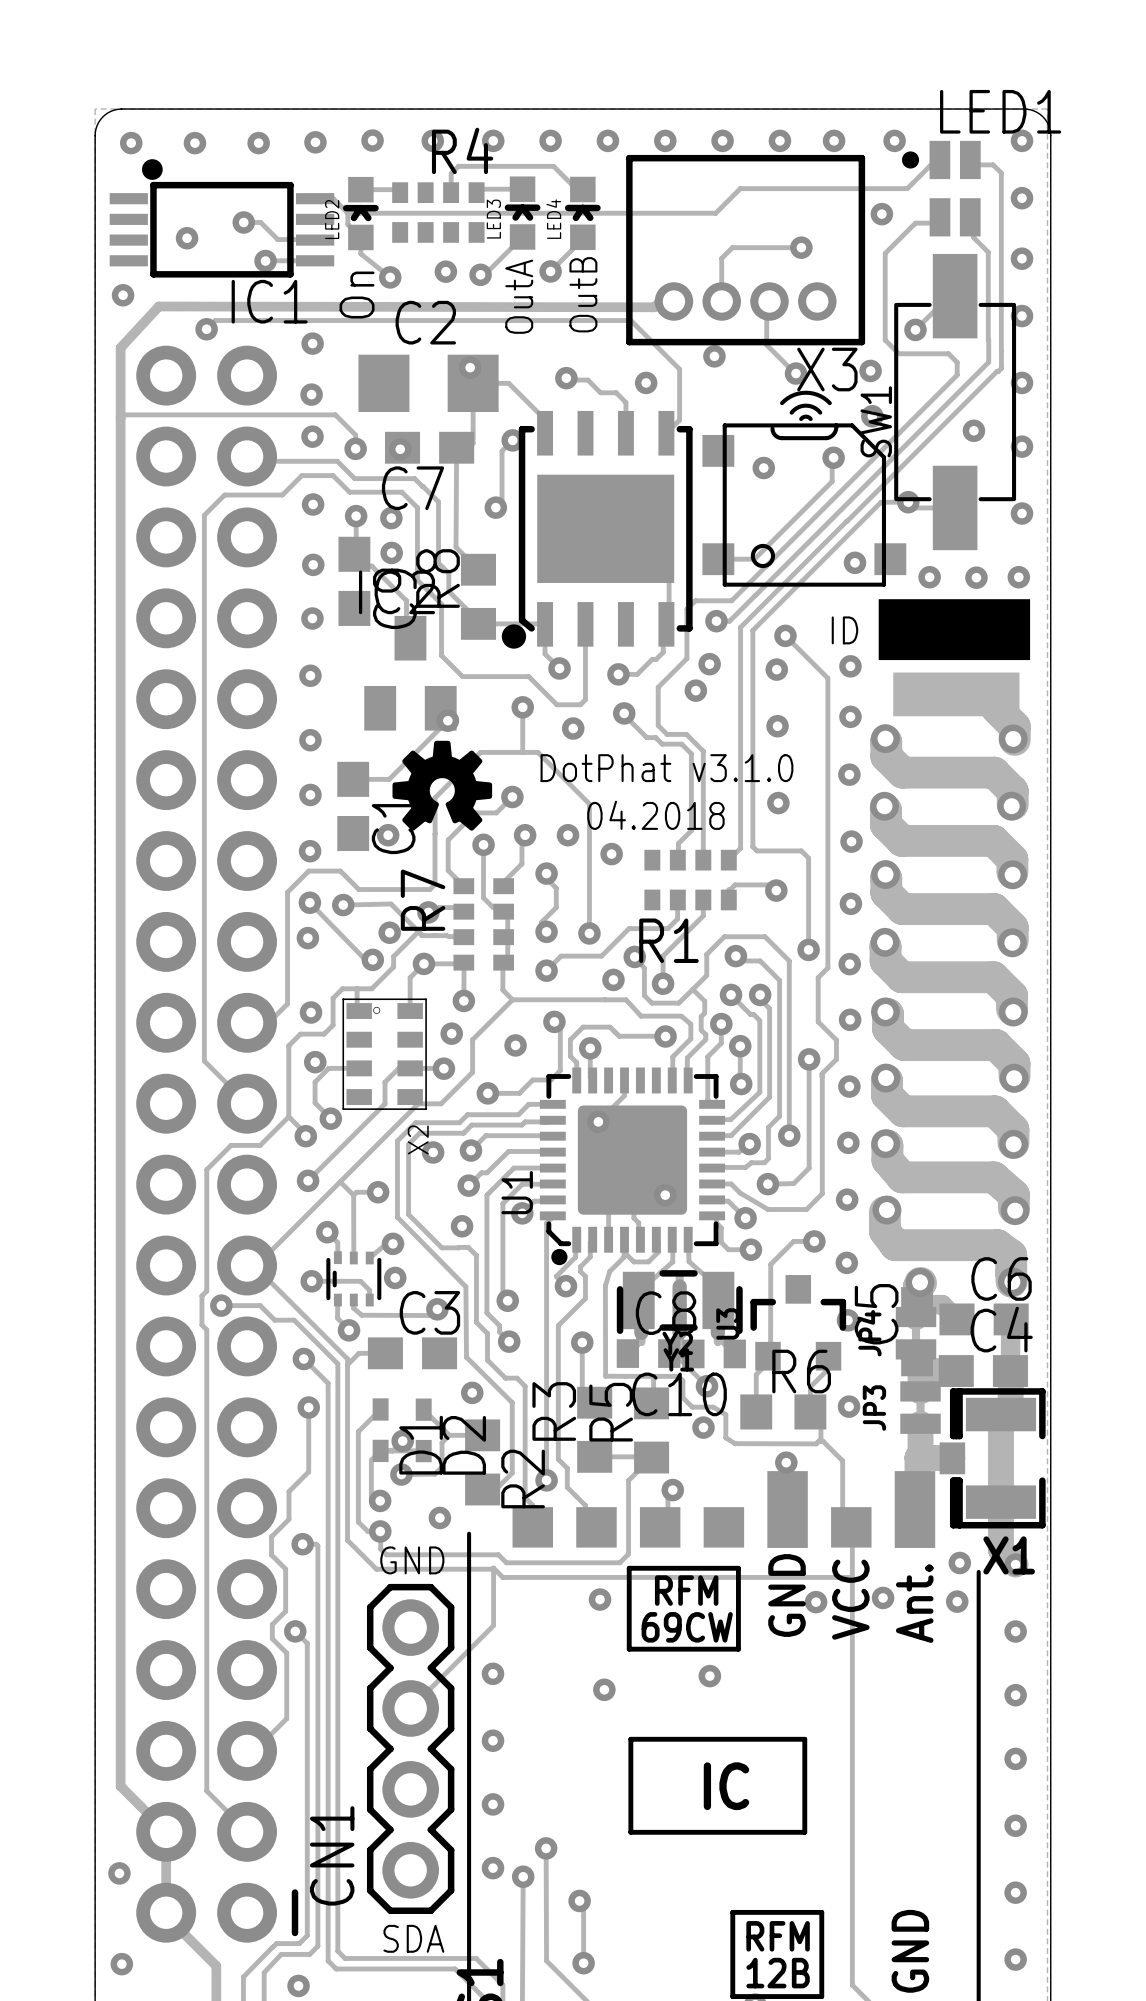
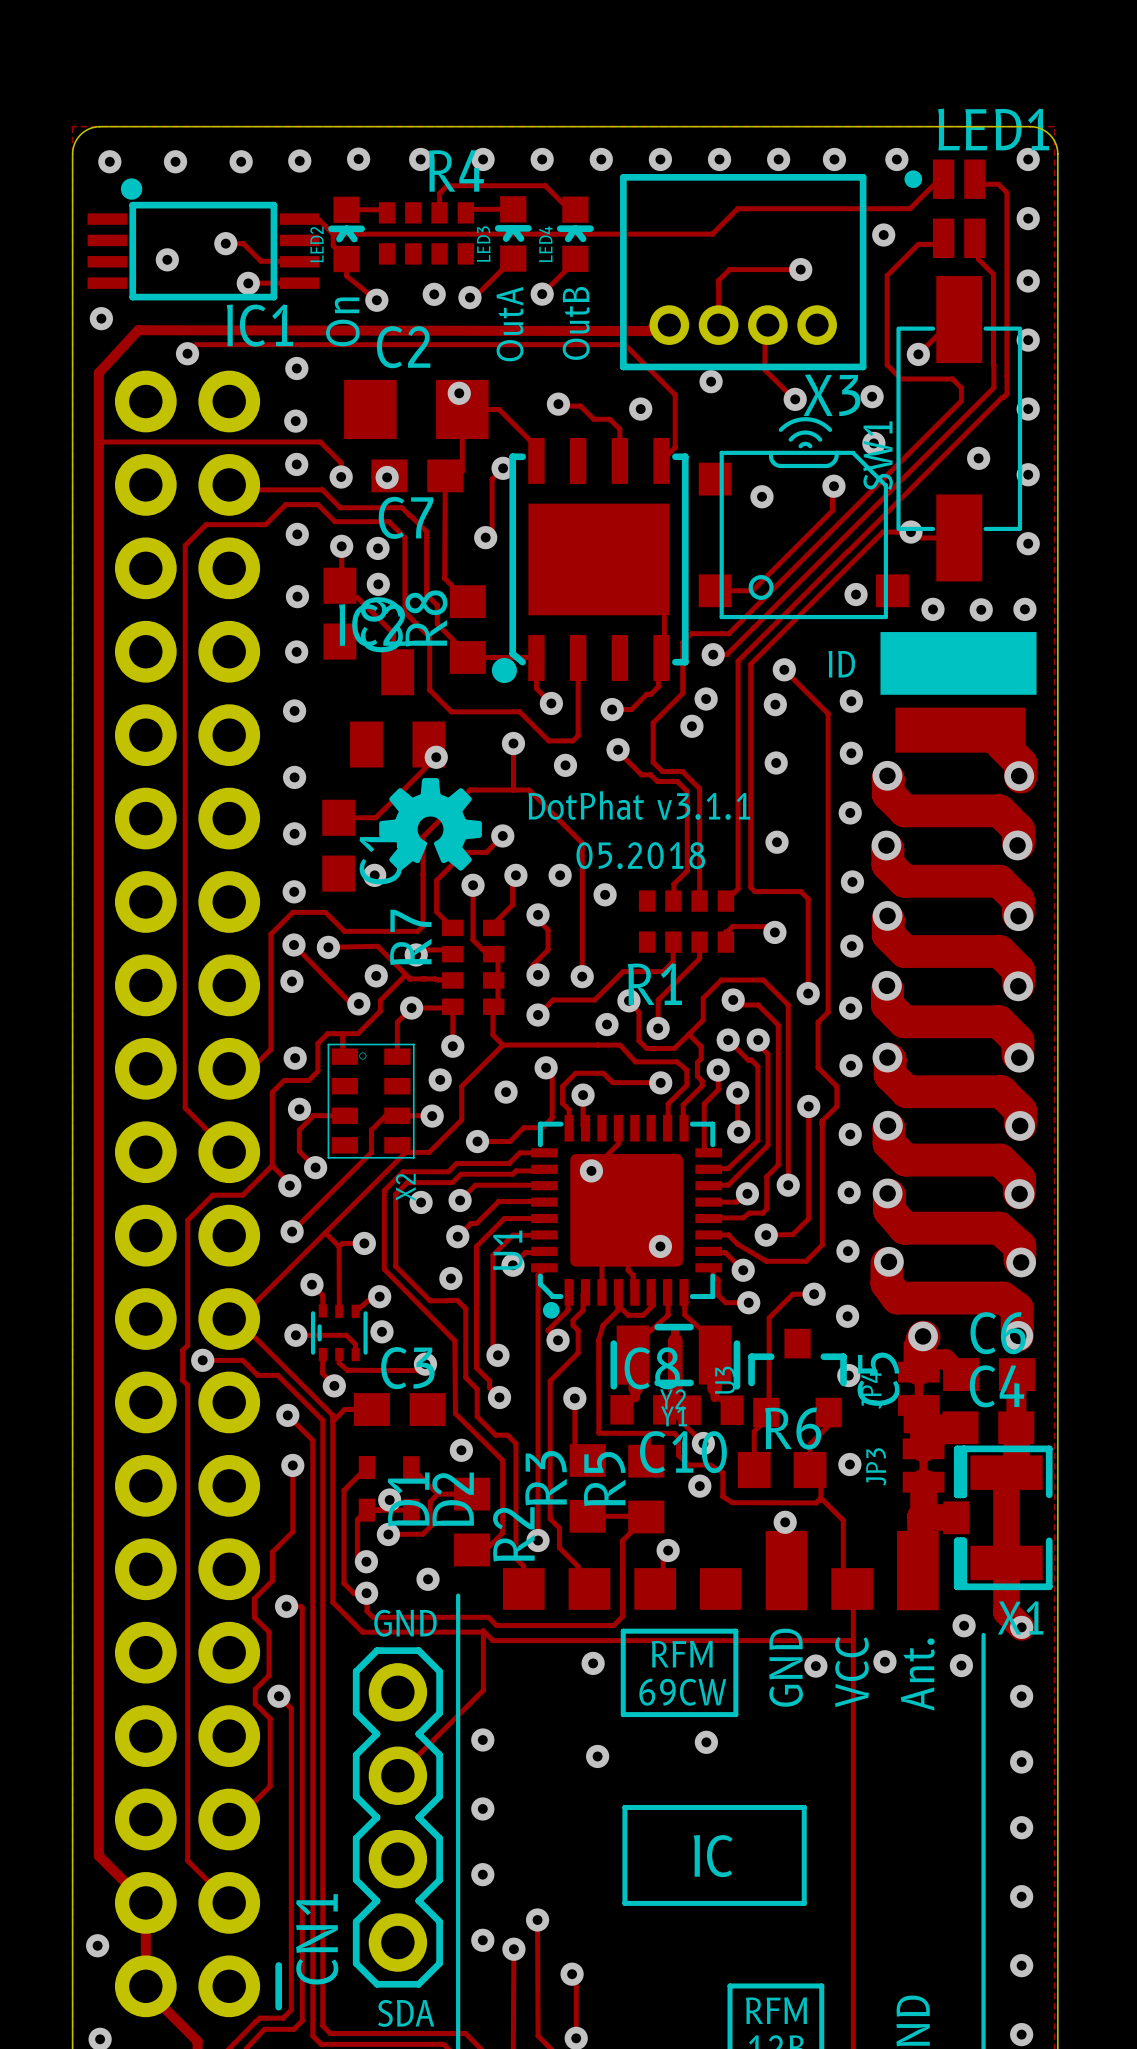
text: DotPhat v3.1.0 (666, 768) -> DotPhat v3.1.1 (639, 805)
text: 04.2018 (655, 815) -> 05.2018 (640, 855)

